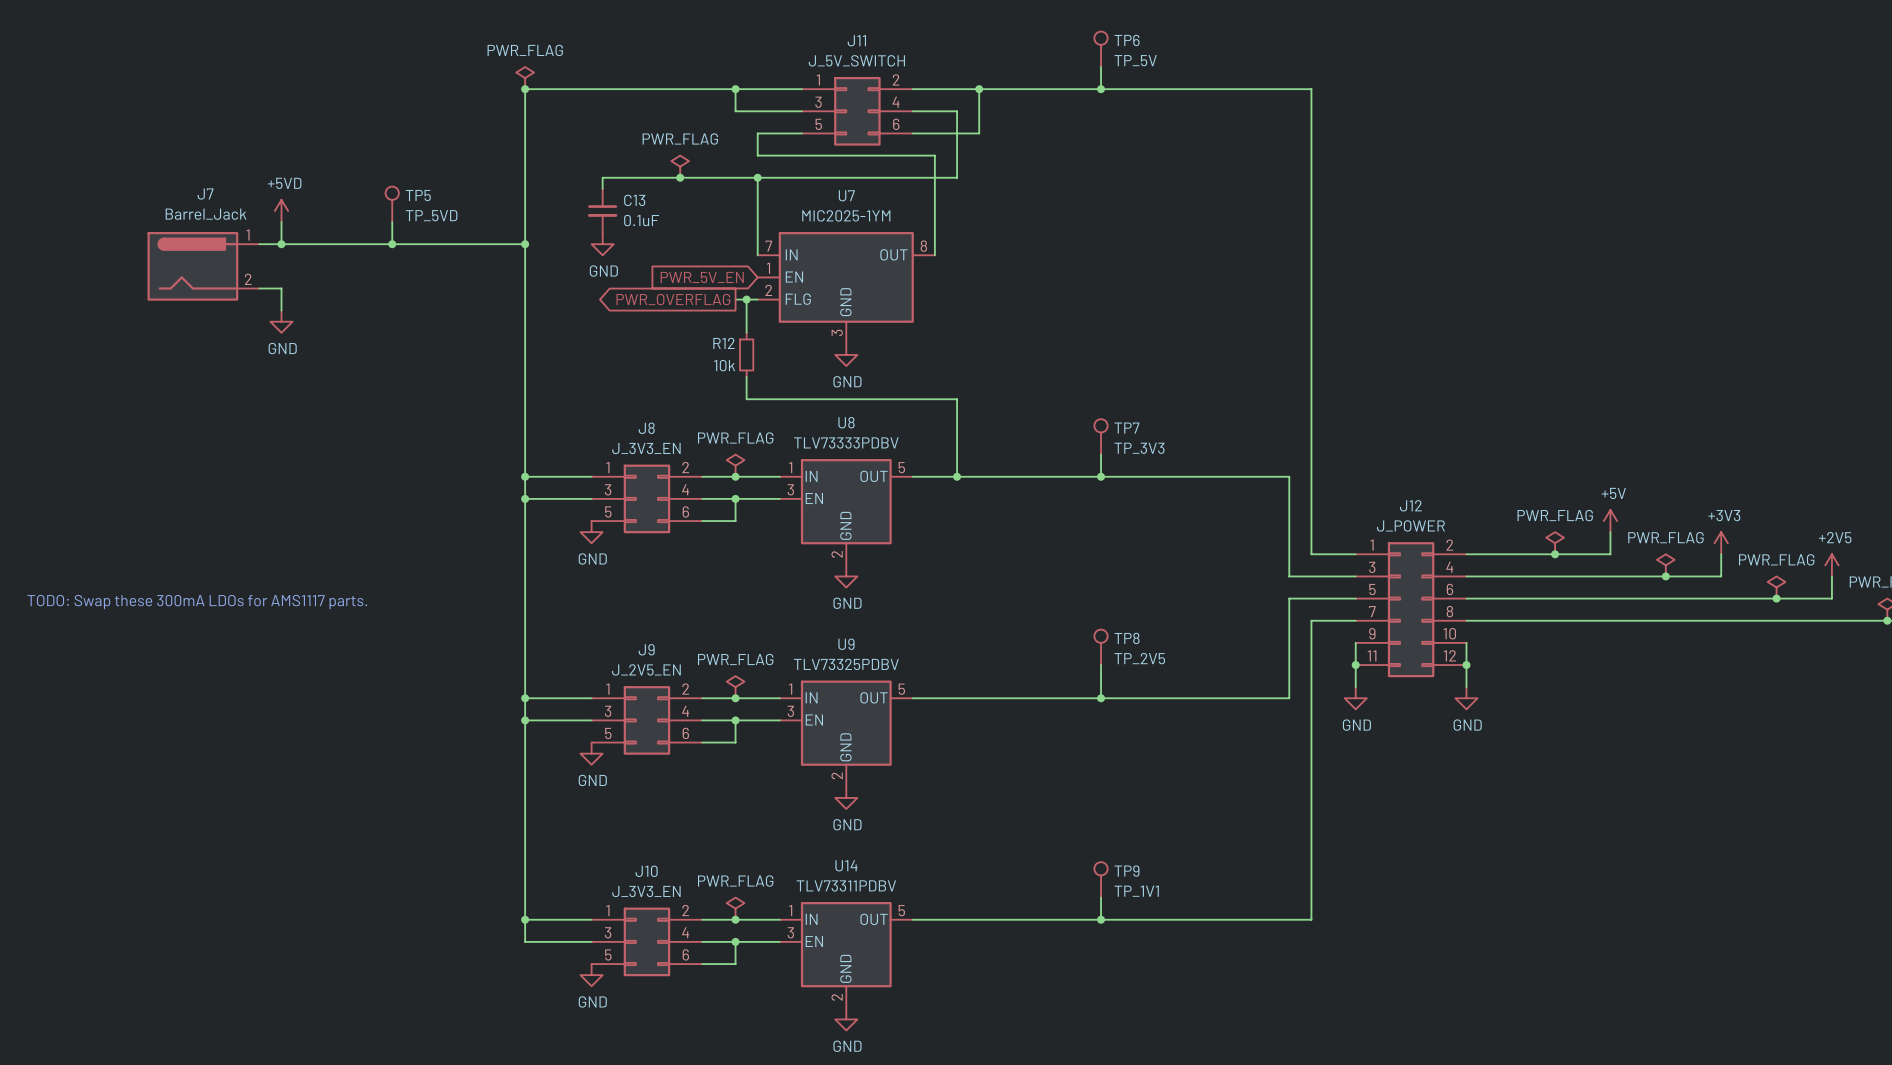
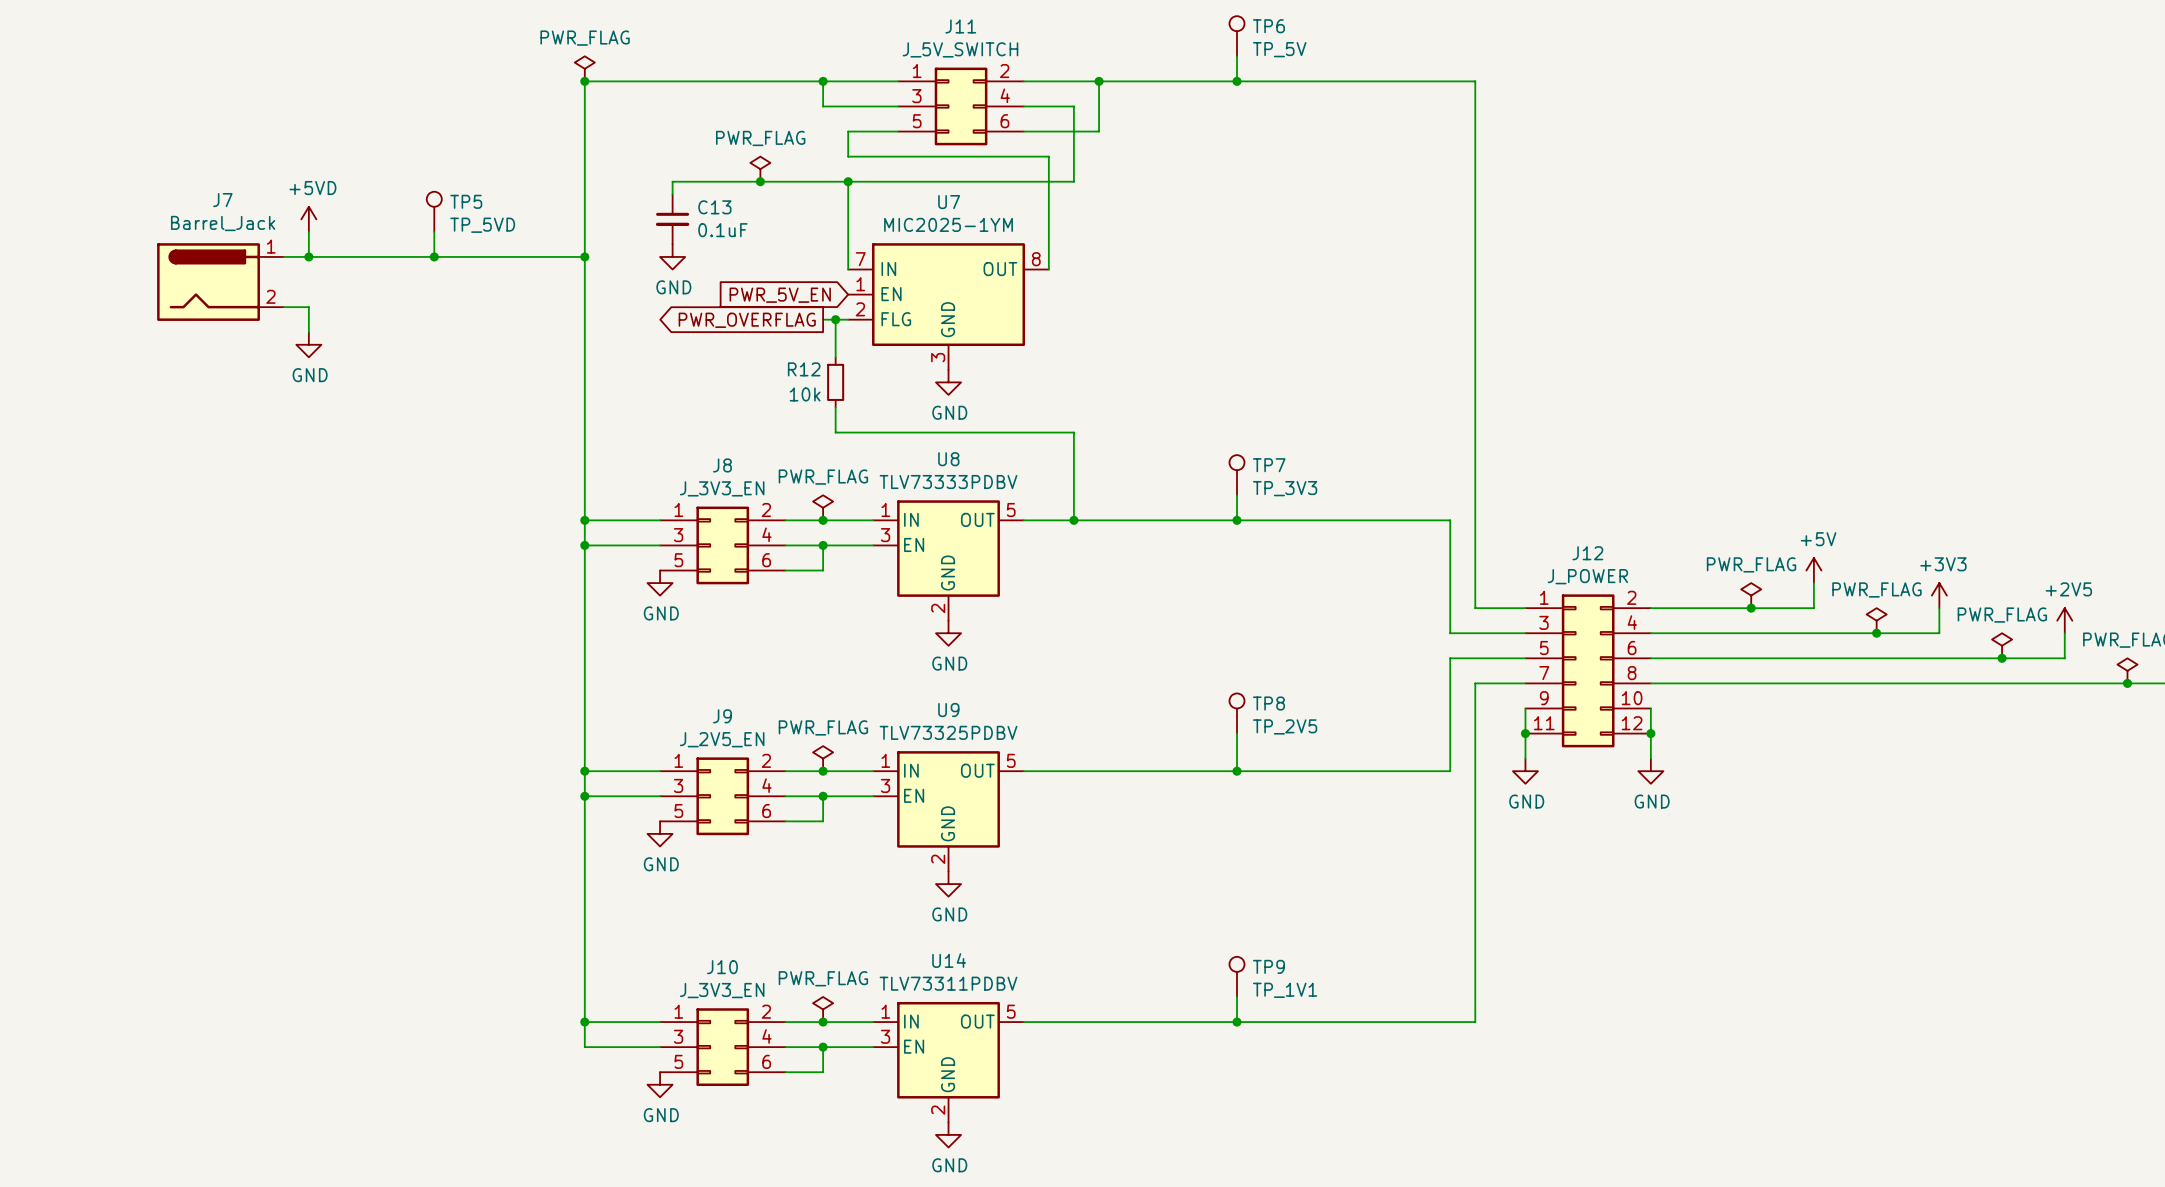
text: TODO: Swap these 300mA LDOs for AMS1117 parts. (197, 602) -> none

